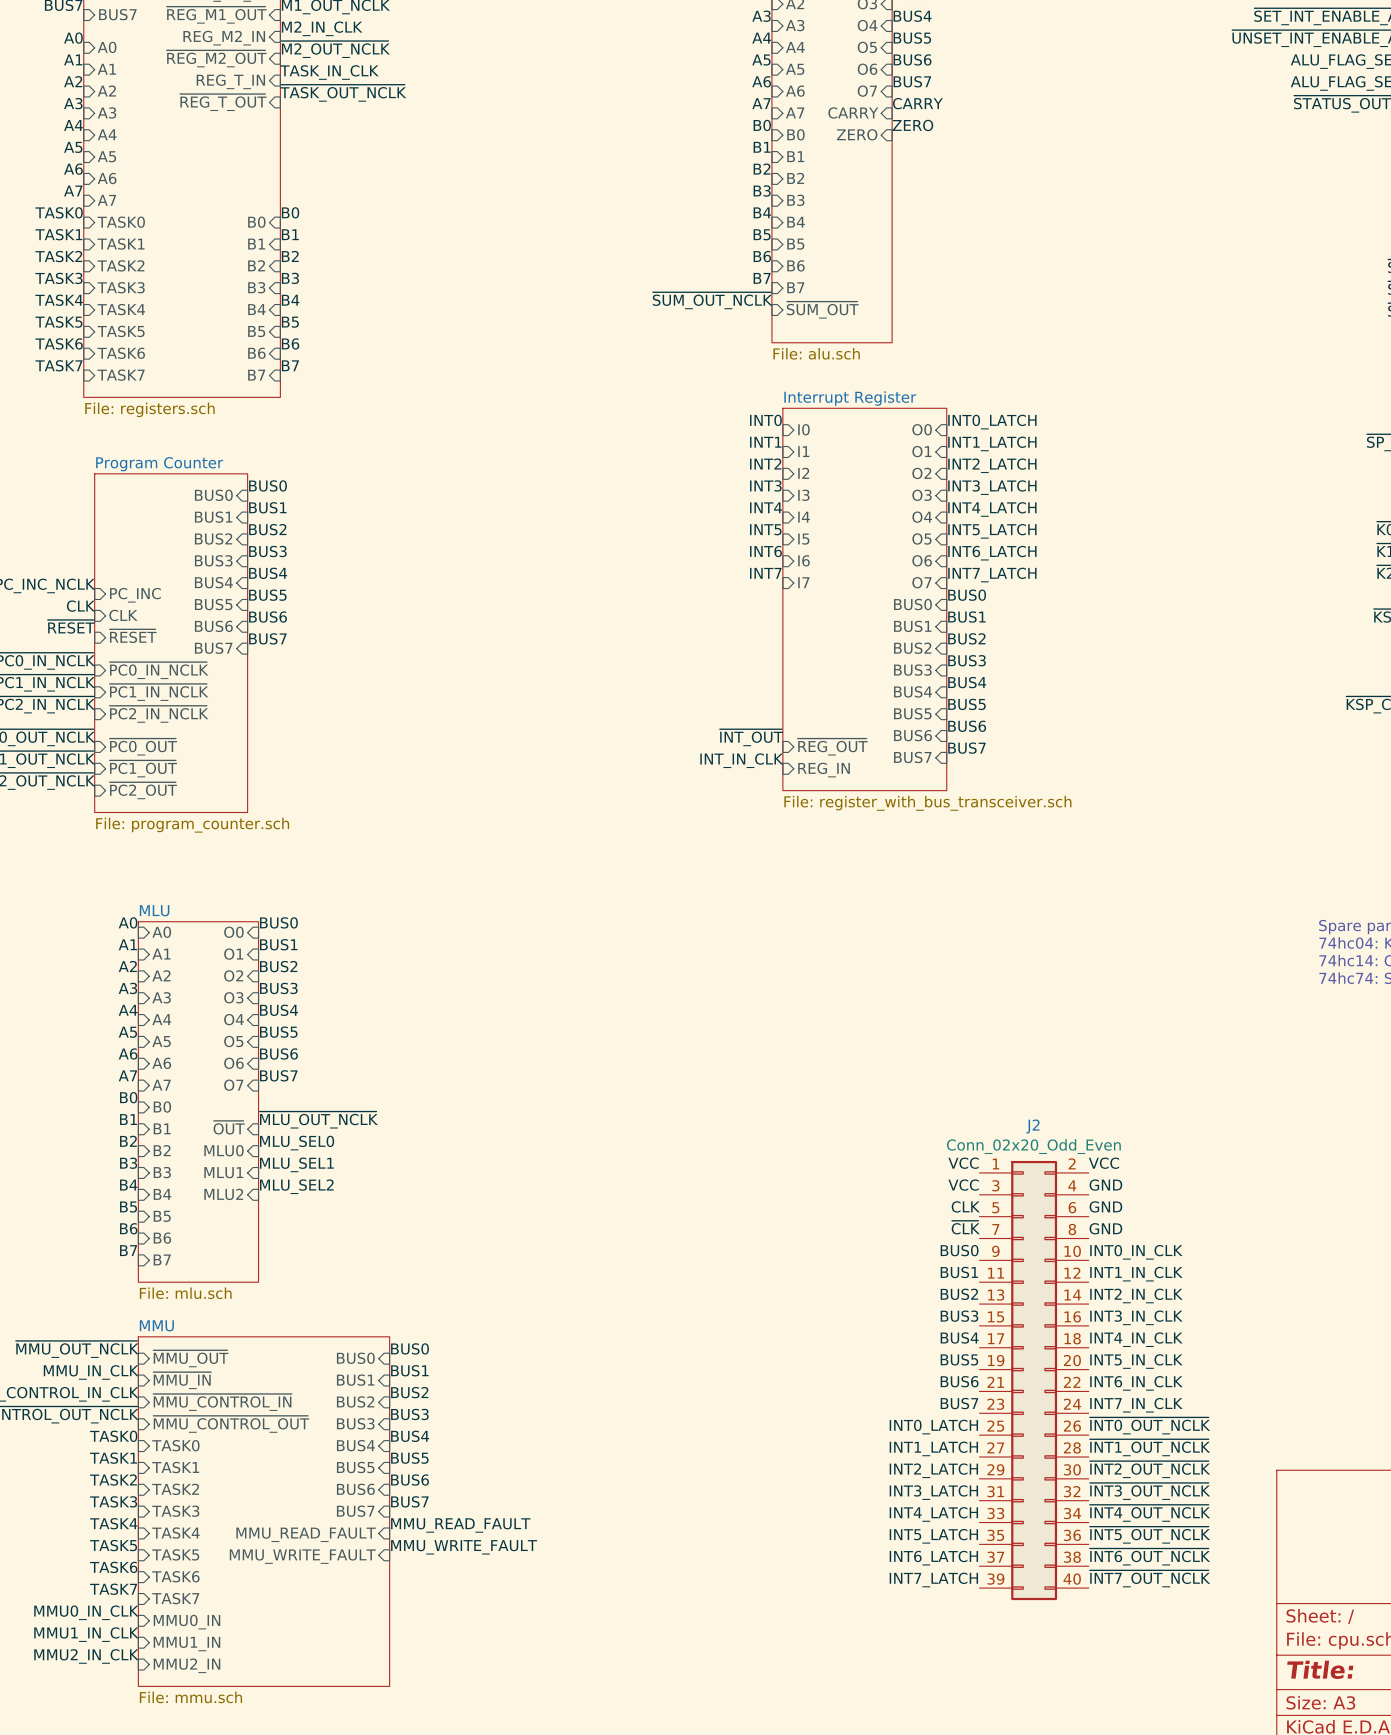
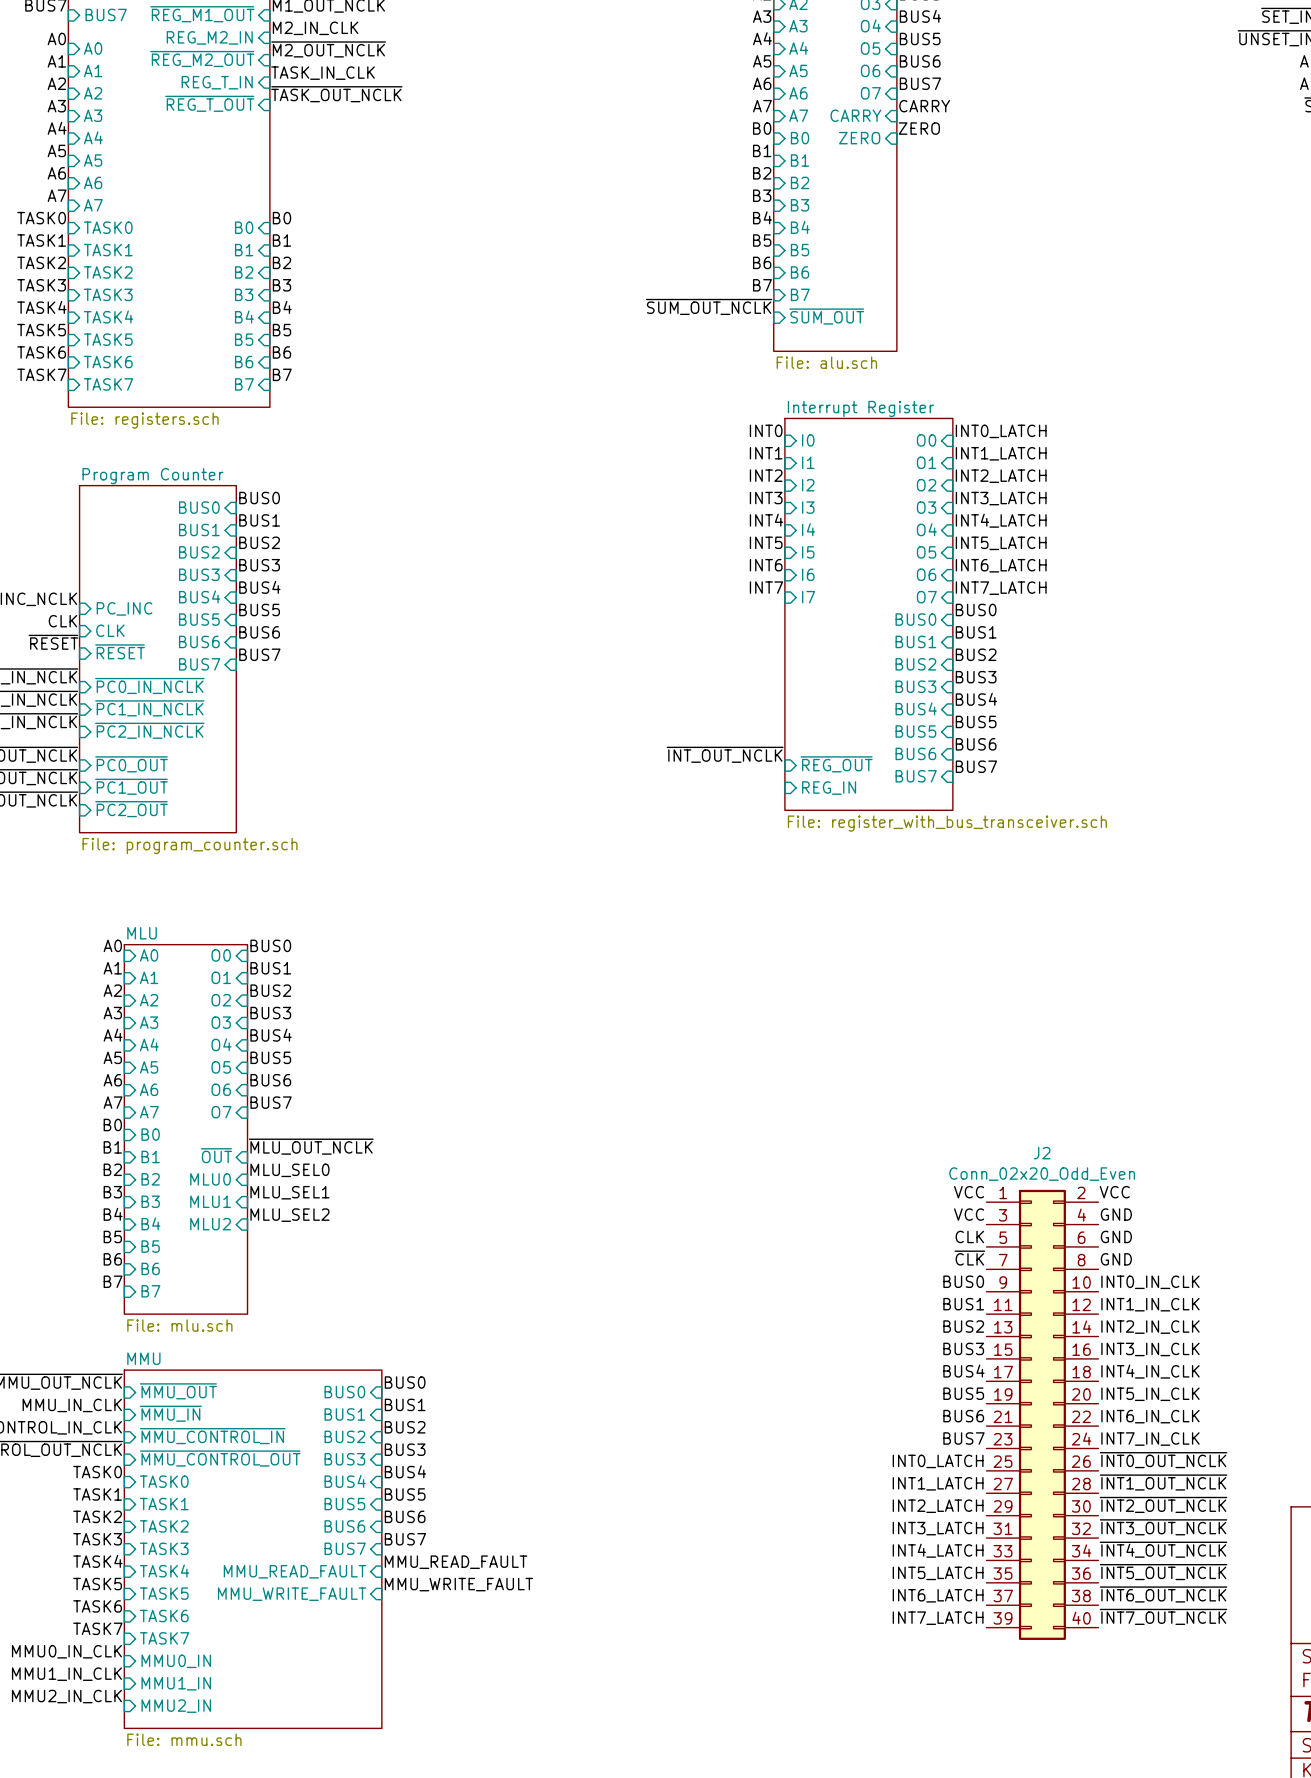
label: ~{INT_OUT} (751, 737) -> ~{INT_OUT_NCLK} (725, 754)
label: INT_IN_CLK (741, 760) -> none

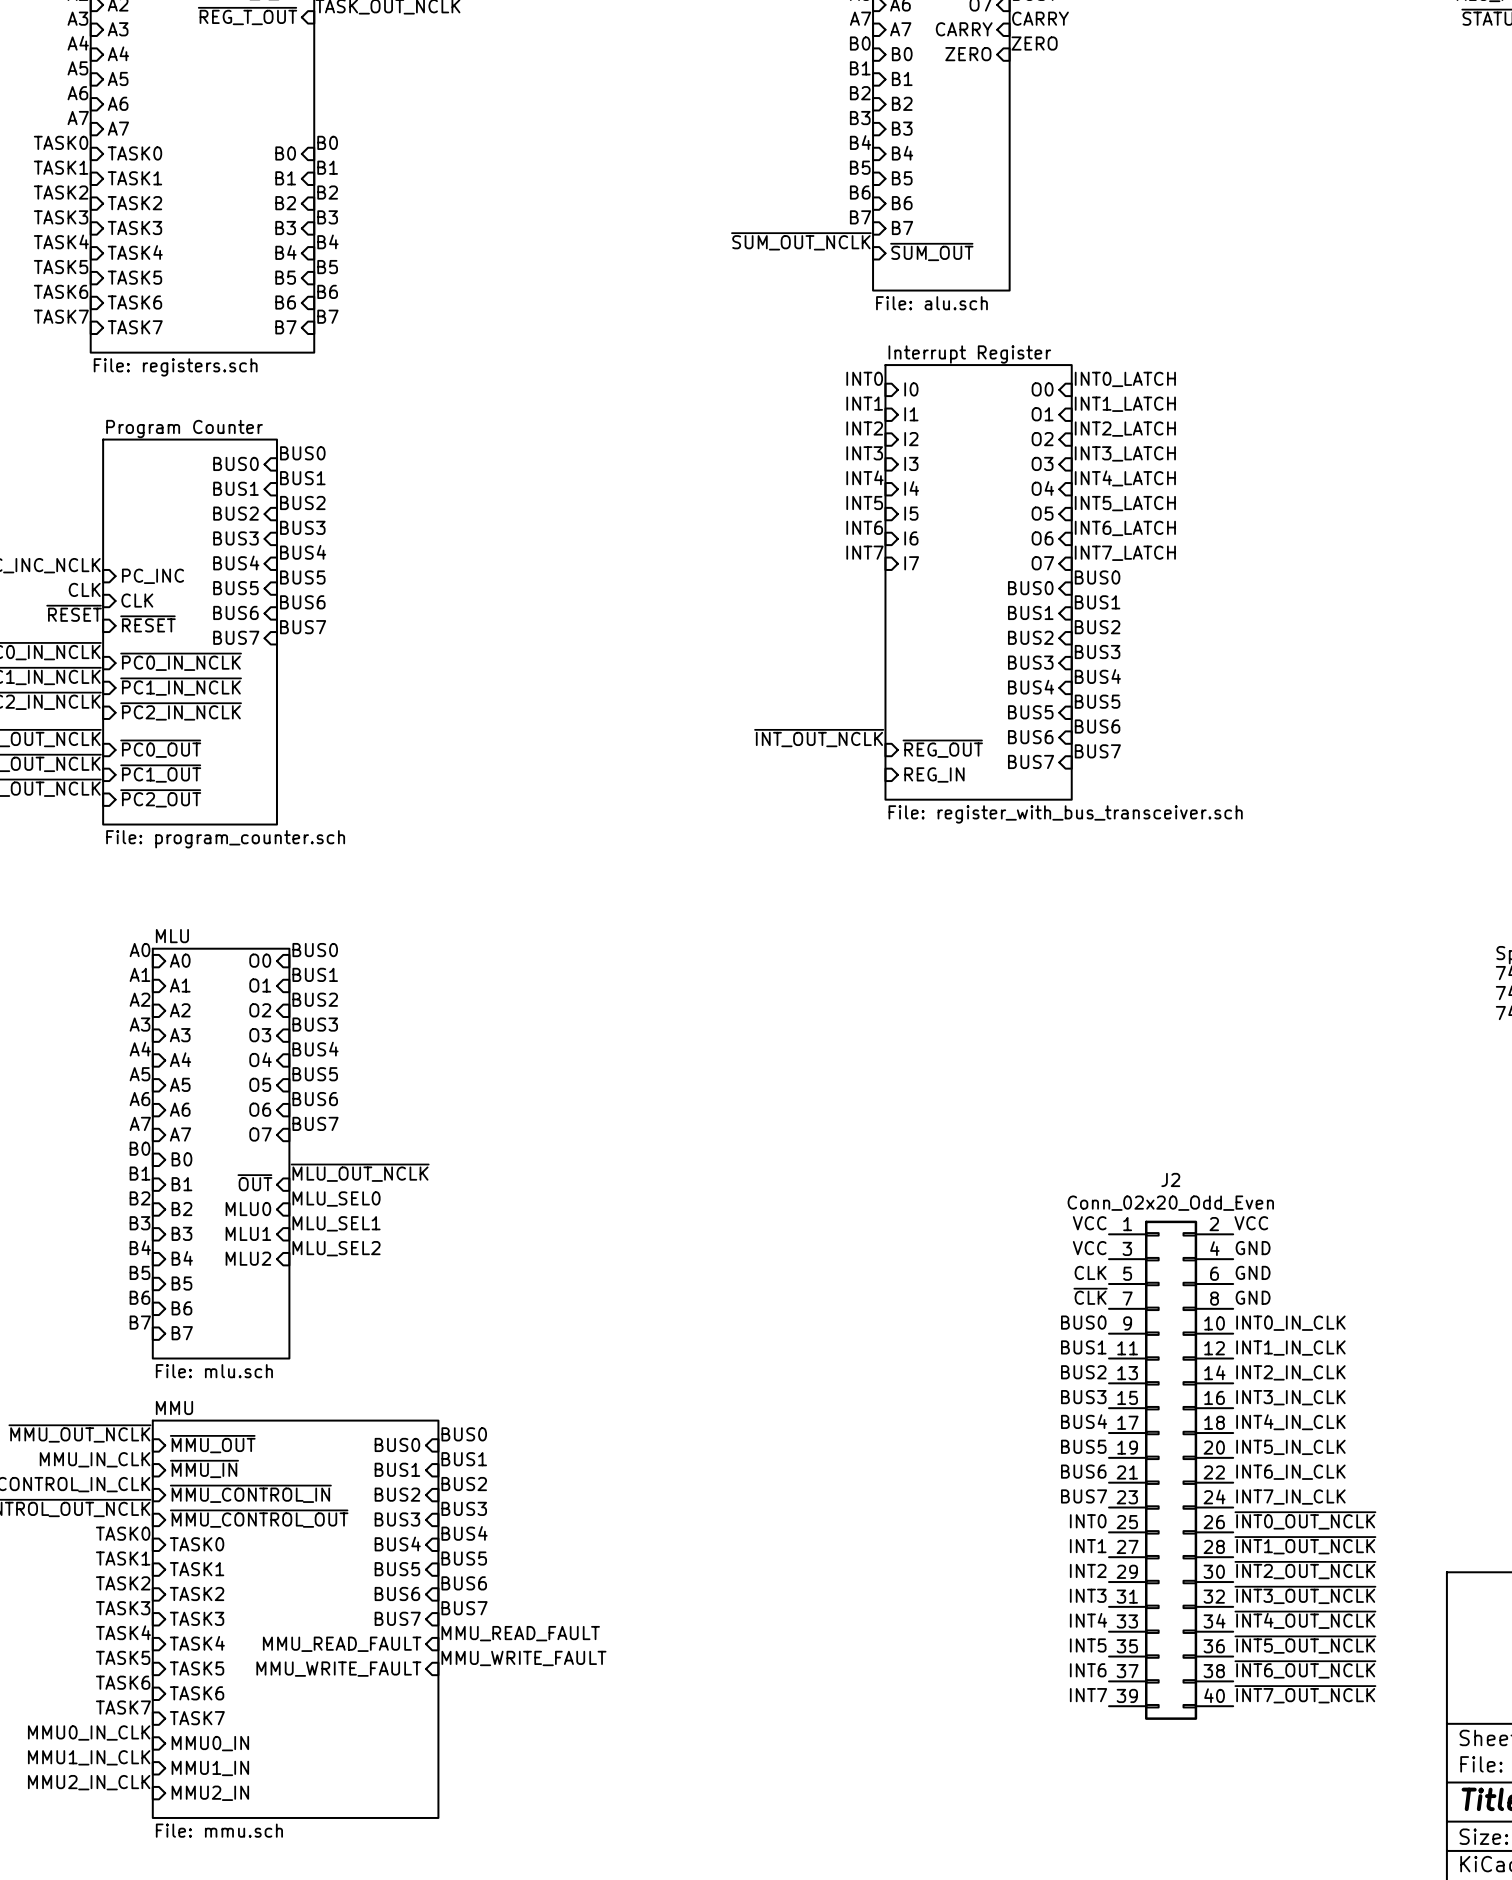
label: INT0_LATCH (938, 1461) -> INT0 (1088, 1521)
label: INT1_LATCH (938, 1483) -> INT1 (1088, 1546)
label: INT2_LATCH (938, 1506) -> INT2 (1088, 1570)
label: INT3_LATCH (938, 1528) -> INT3 (1088, 1595)
label: INT4_LATCH (938, 1550) -> INT4 (1088, 1620)
label: INT5_LATCH (938, 1573) -> INT5 (1088, 1645)
label: INT6_LATCH (938, 1595) -> INT6 (1088, 1670)
label: INT7_LATCH (938, 1618) -> INT7 (1088, 1695)

